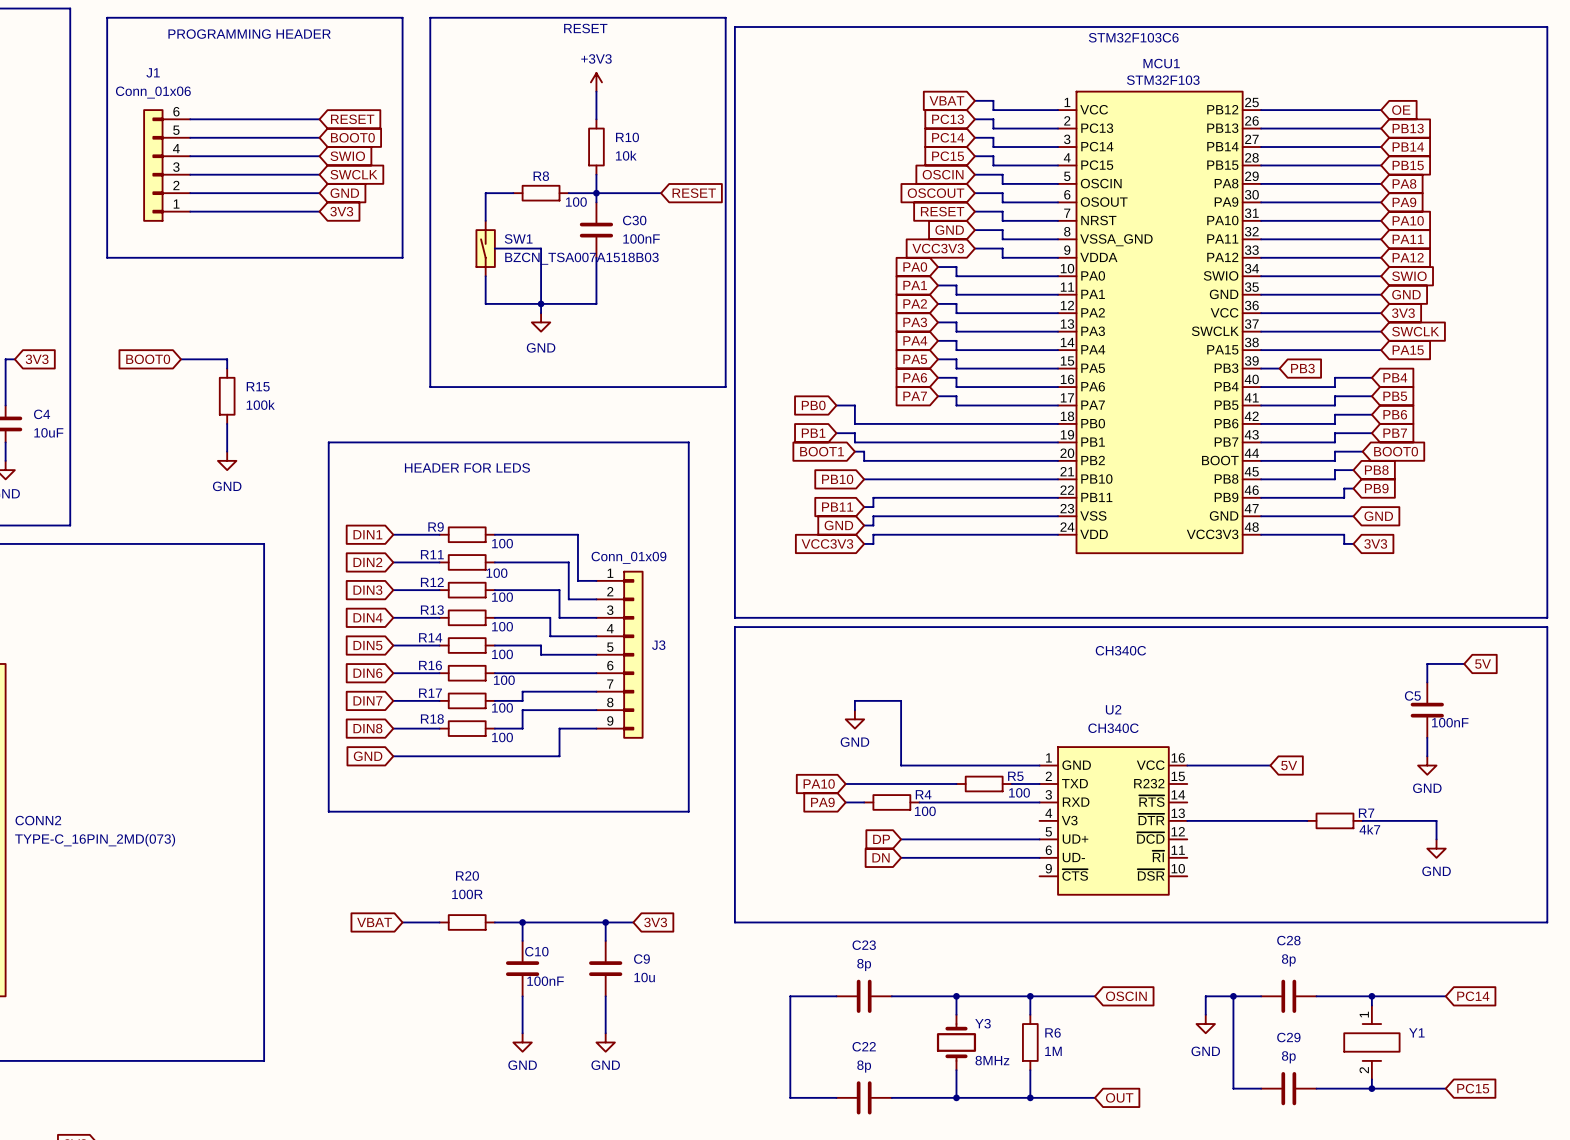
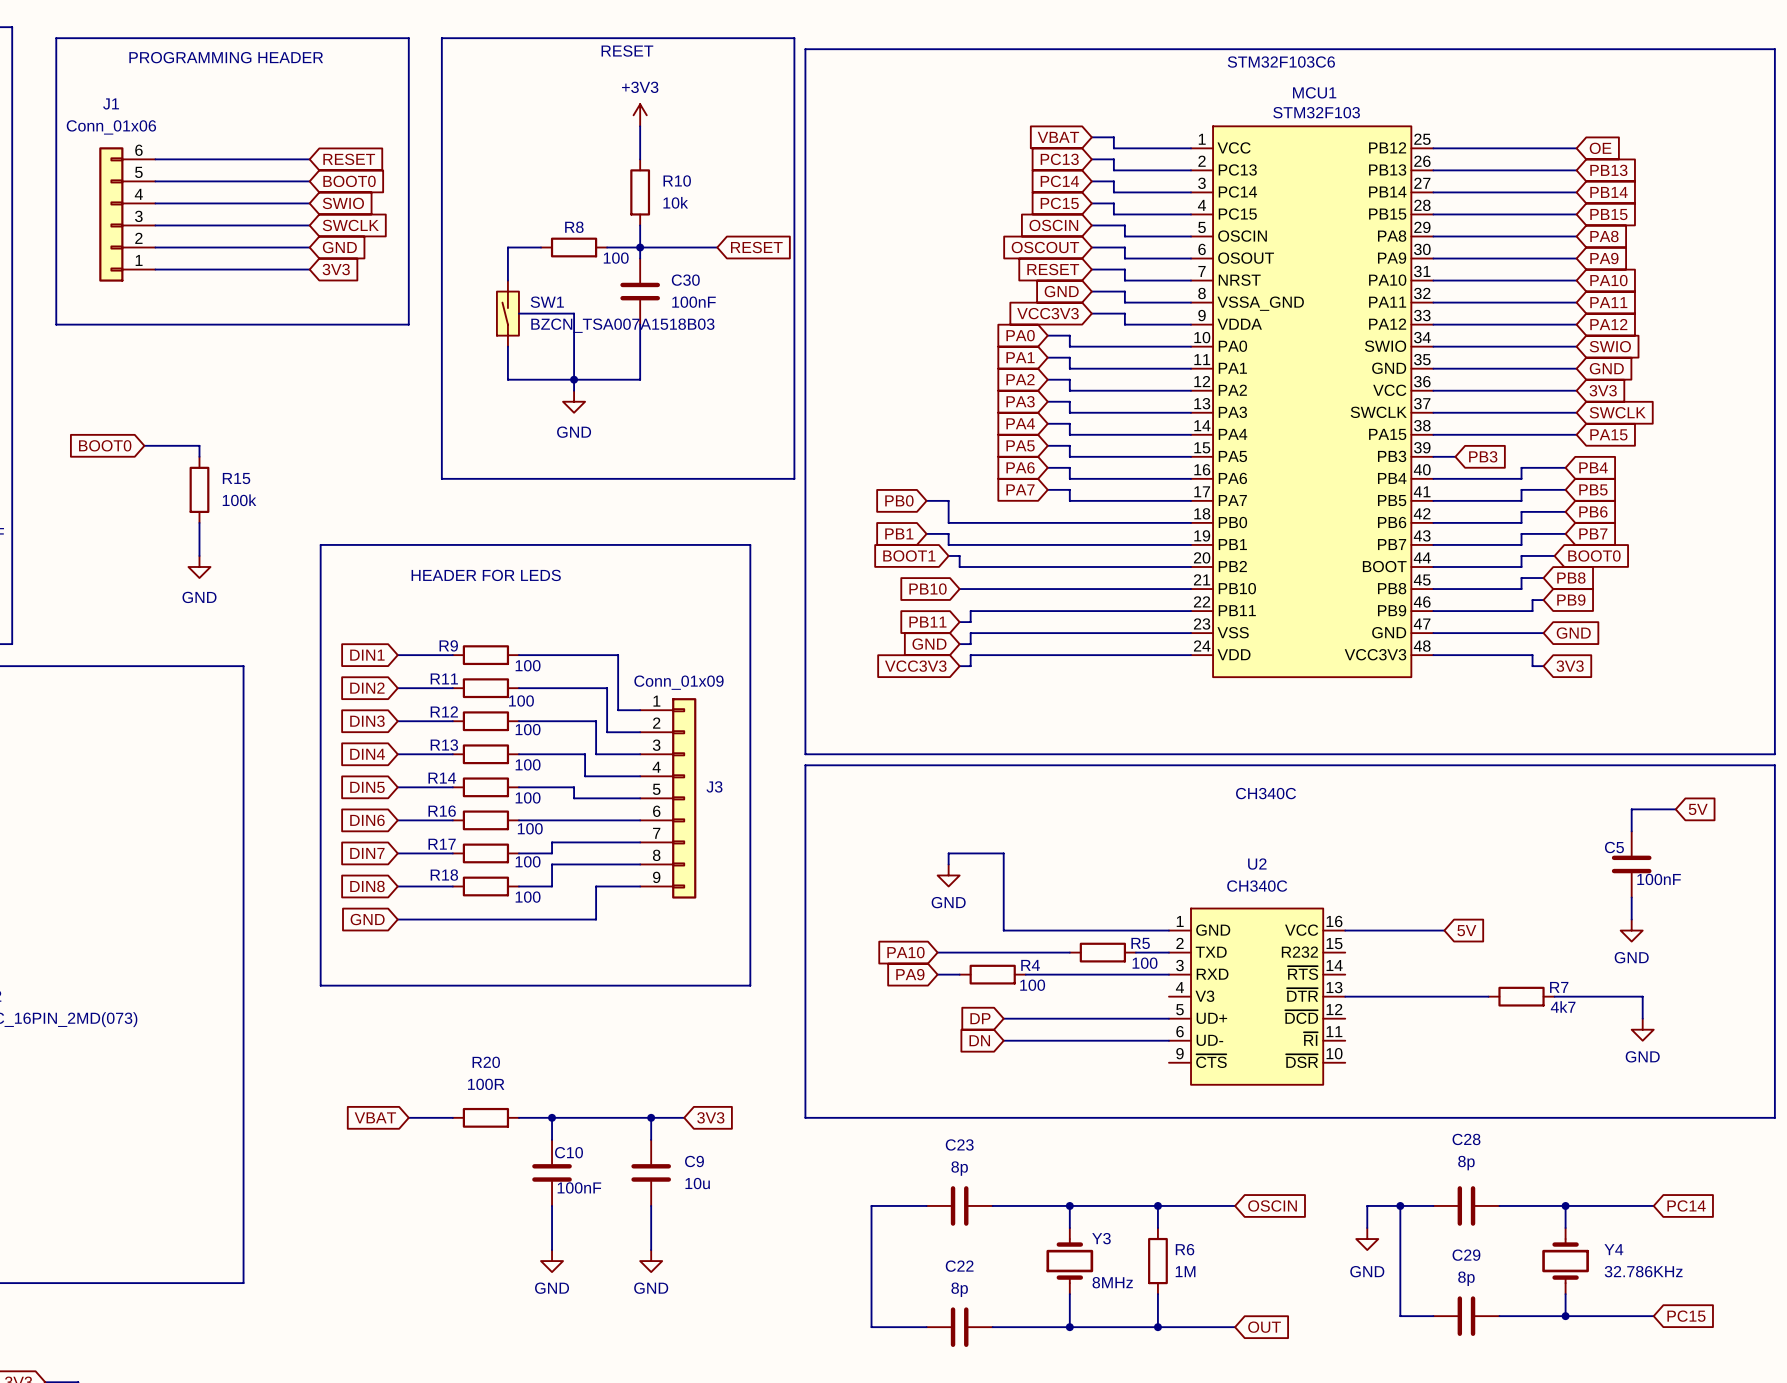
Y1: (1371, 1042) -> none
Y4: none -> 32.786KHz (1565, 1261)

